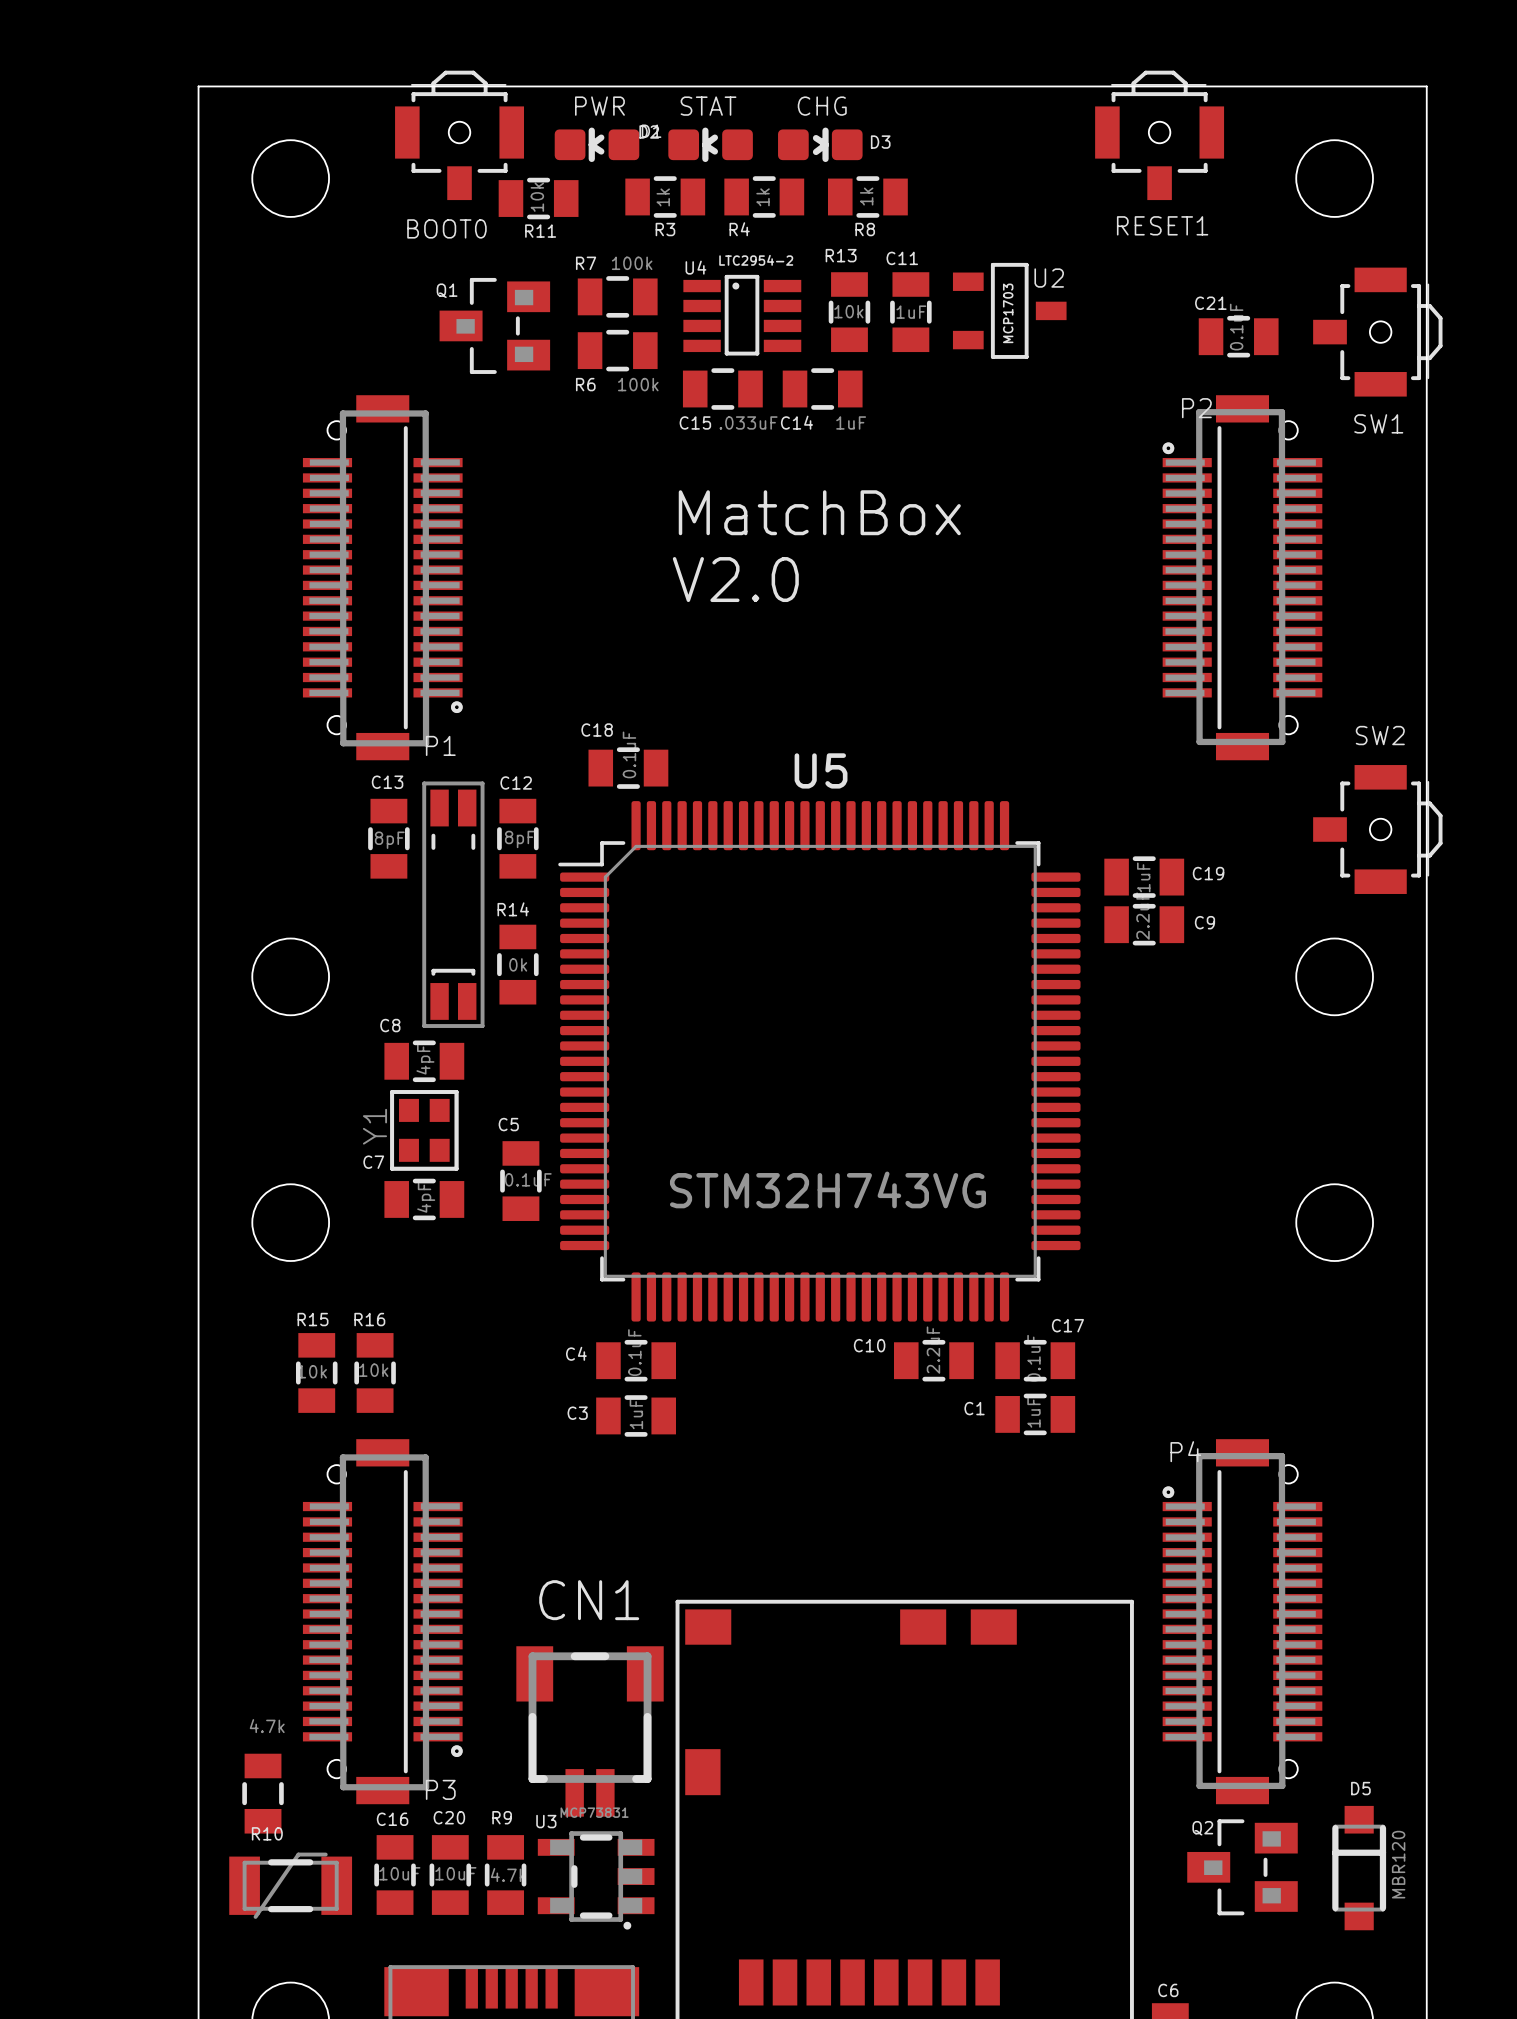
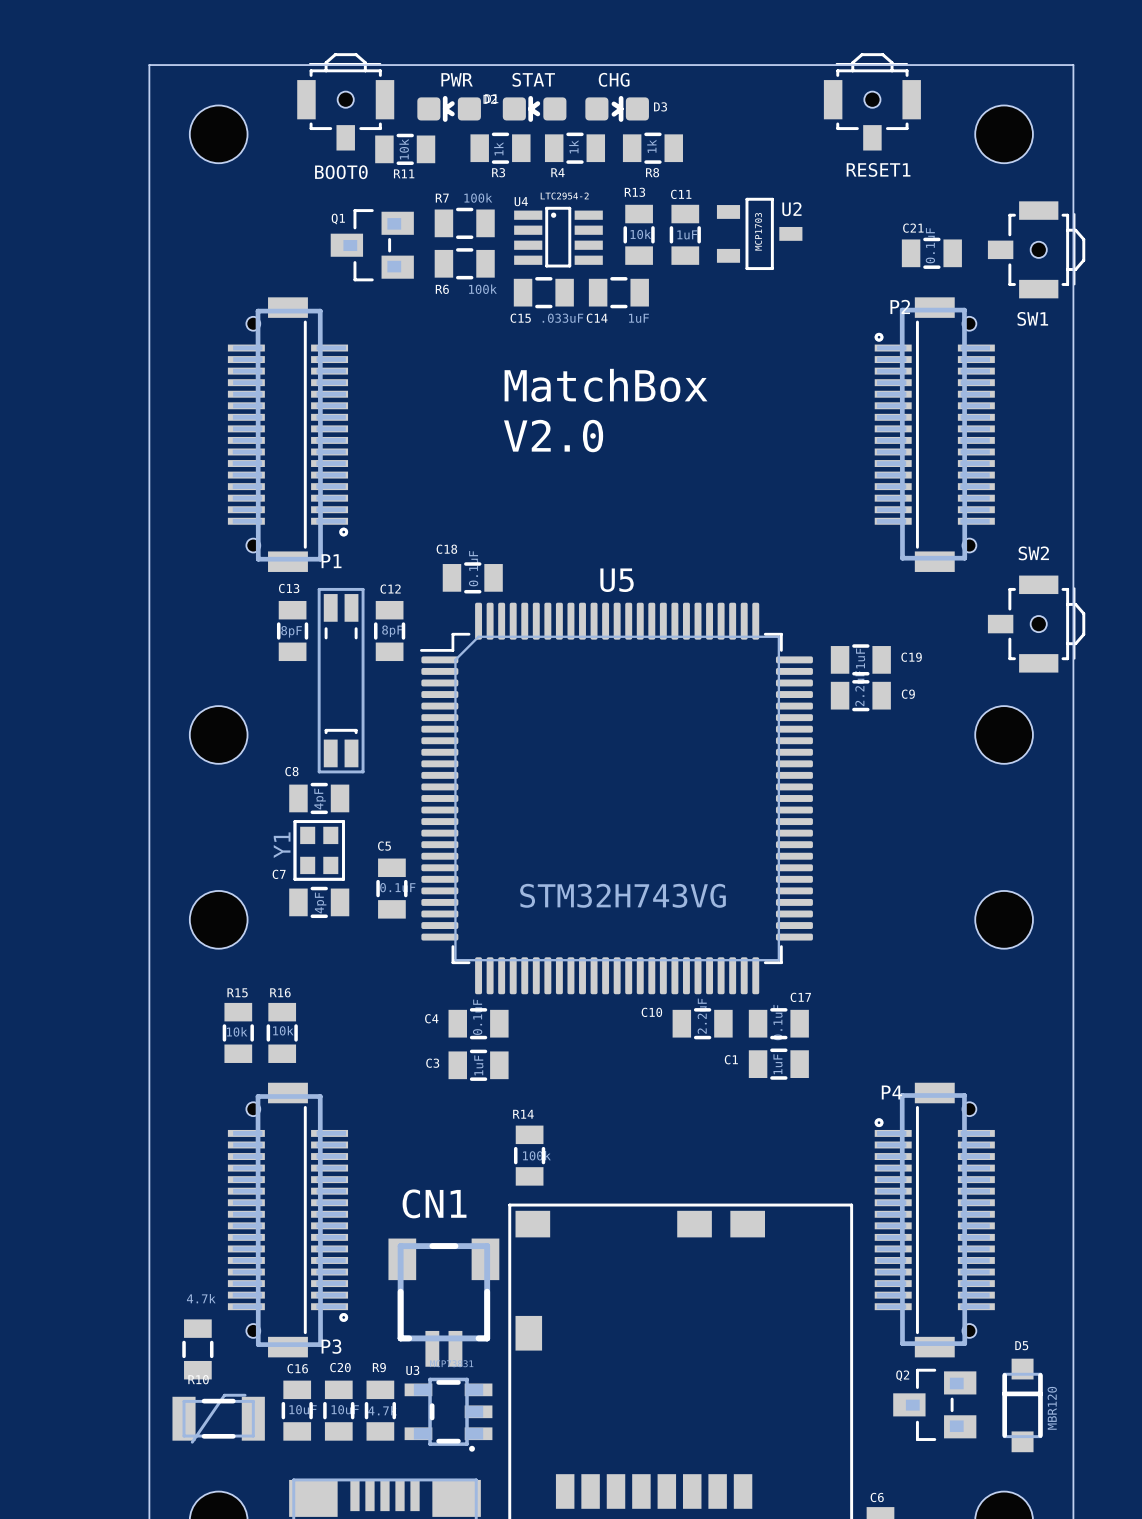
R14 position: (517, 964) -> (529, 1155)
R14 value: 0k (518, 964) -> 100k (536, 1155)

